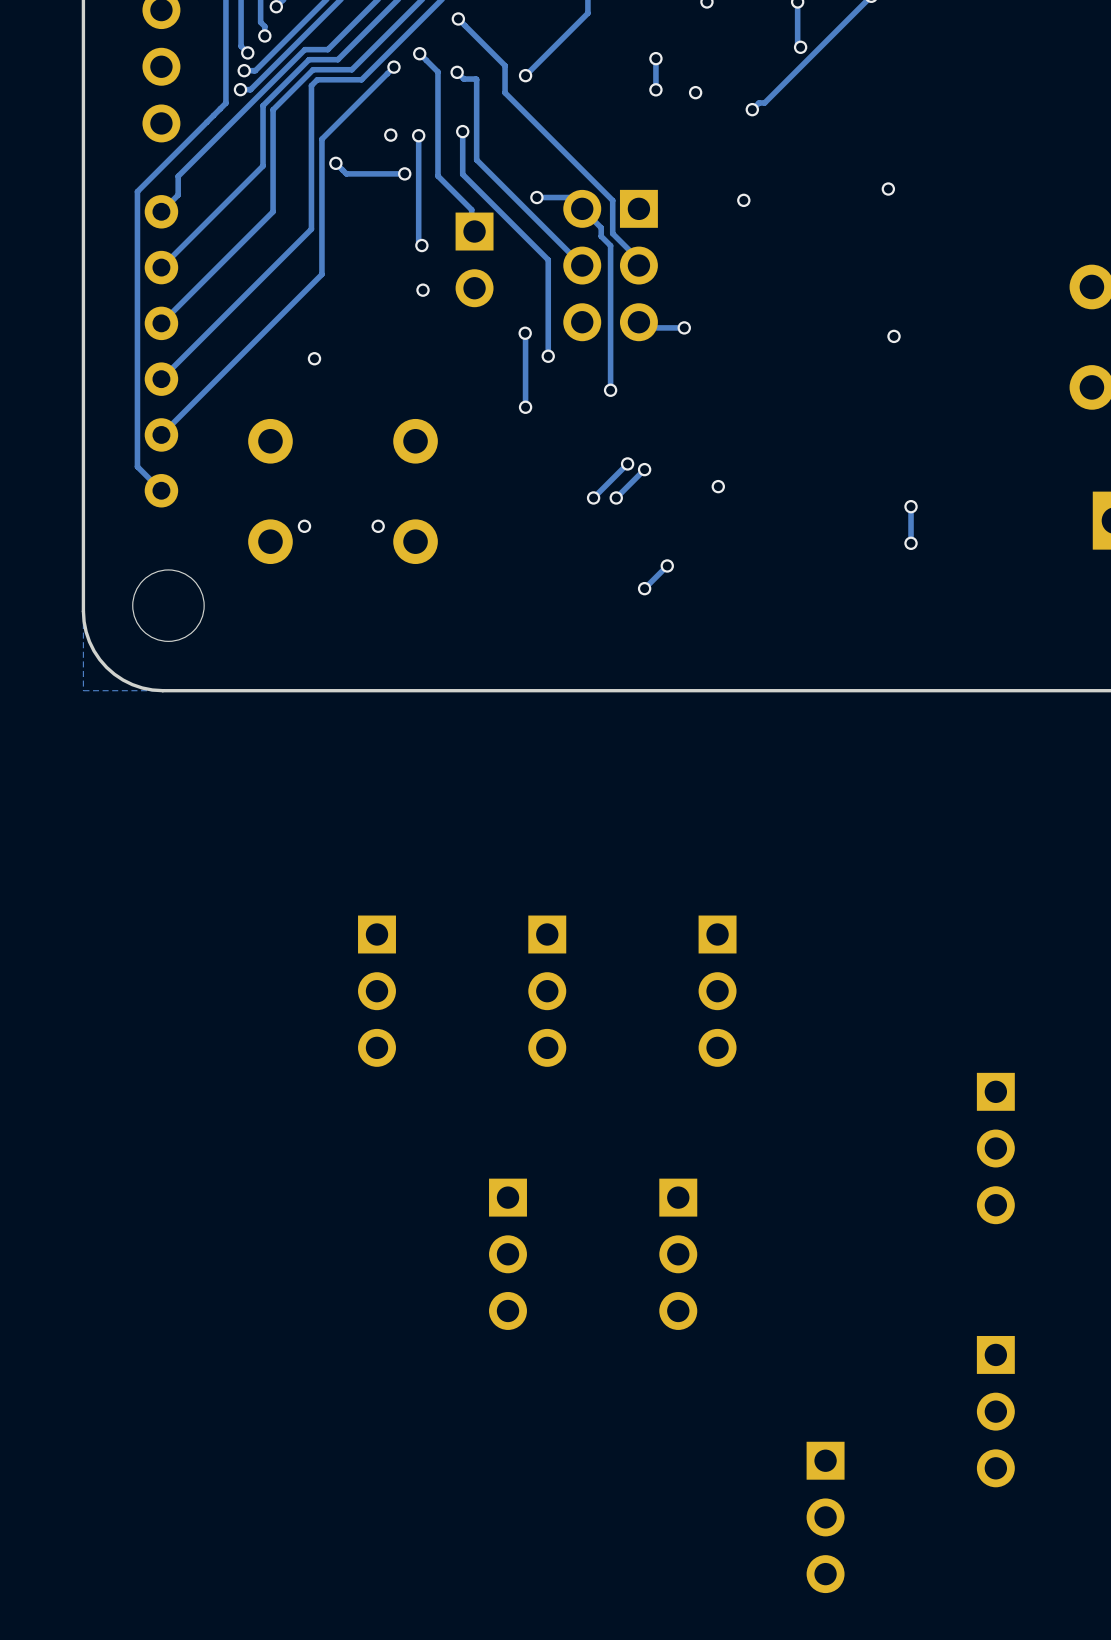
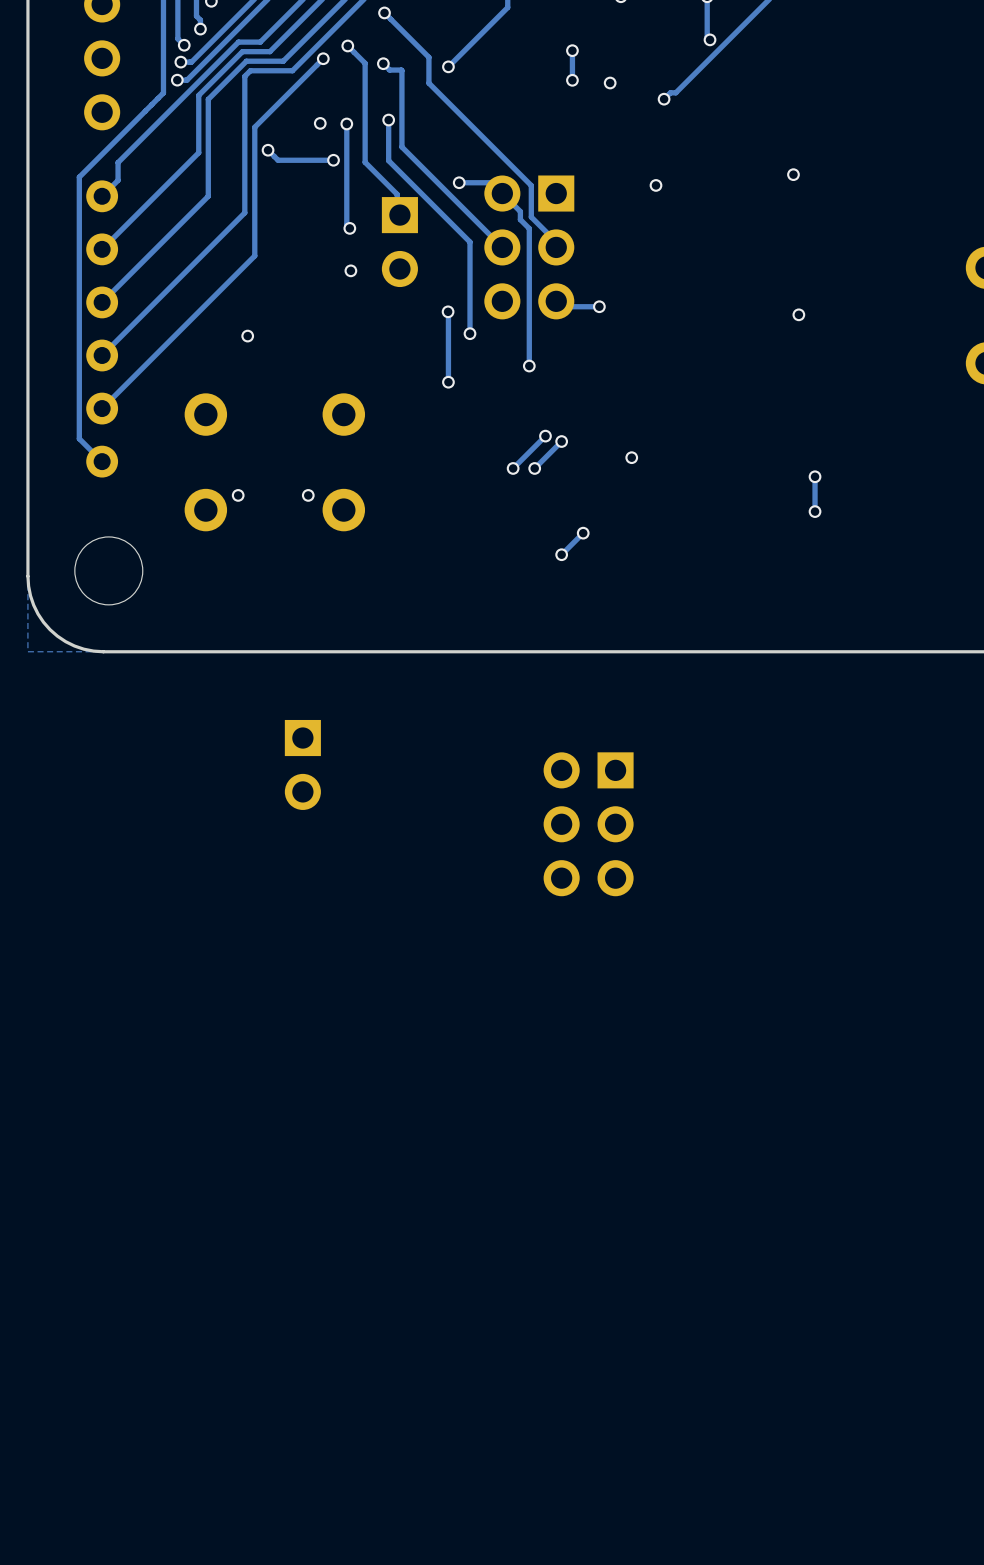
part: none -> (302, 764)
part: none -> (588, 824)
part: (377, 991) -> none
part: (547, 991) -> none
part: (717, 991) -> none
part: (995, 1148) -> none
part: (508, 1254) -> none
part: (678, 1254) -> none
part: (995, 1411) -> none
part: (825, 1517) -> none

